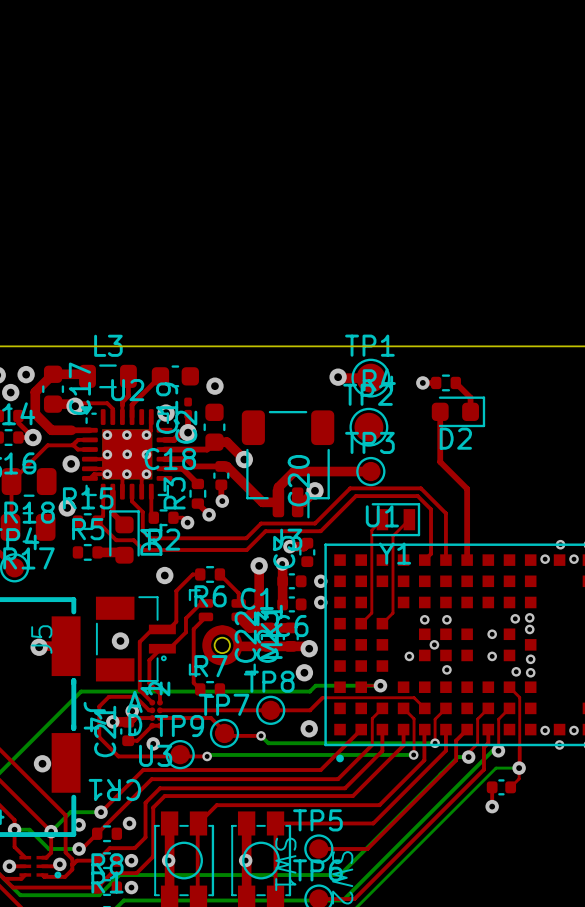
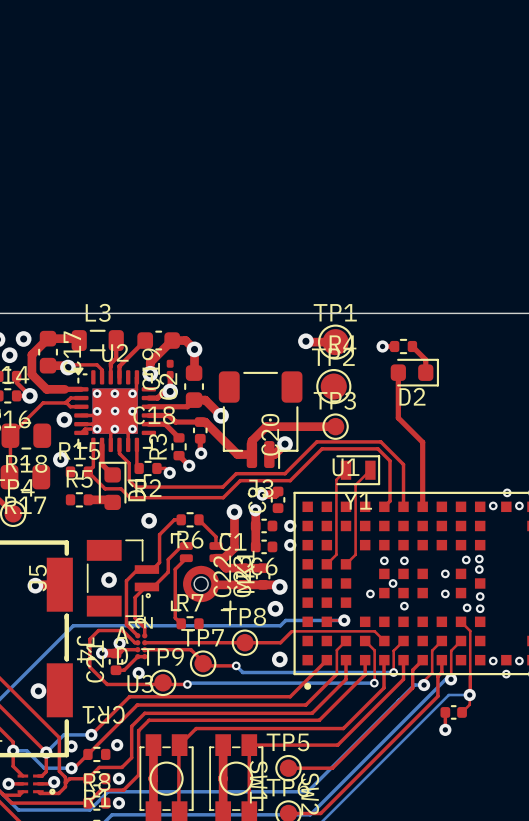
top track: none -> (194, 372) (194, 349) (185, 340) (172, 340) (150, 362) (150, 373)
via: (168, 860) -> none
via: (245, 860) -> none

